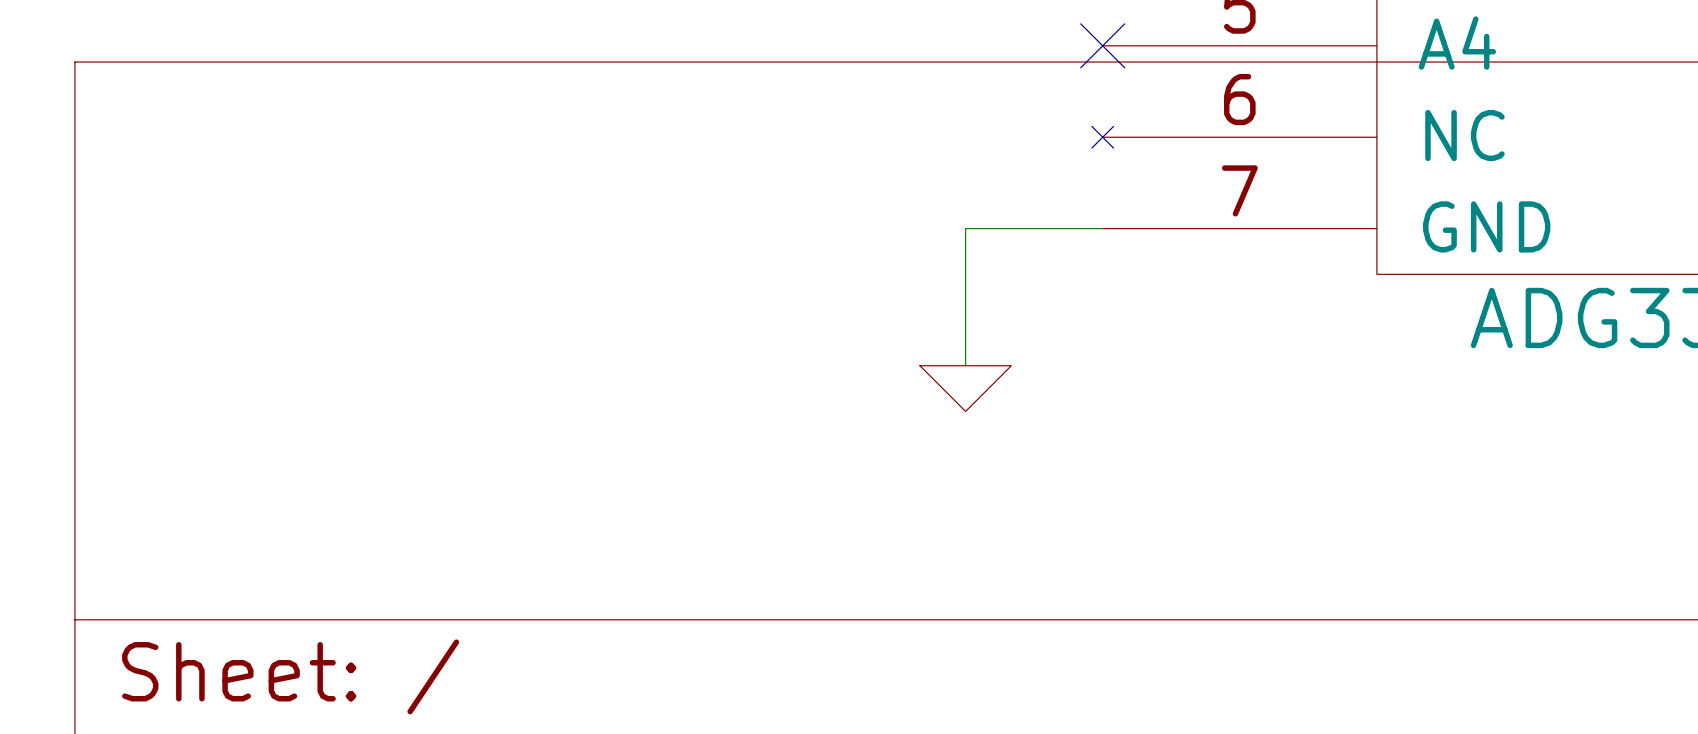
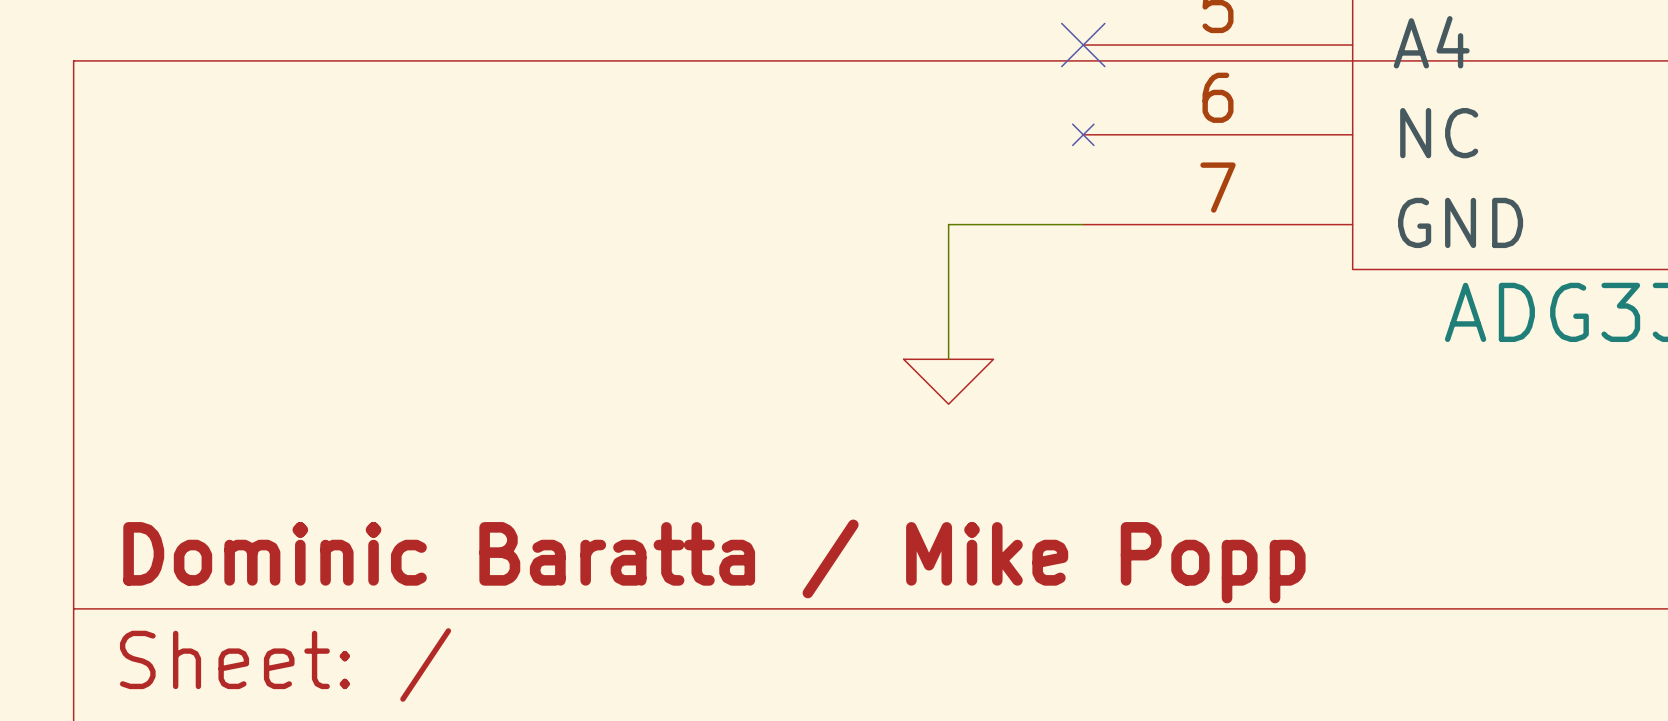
title block: none -> Dominic Baratta / Mike Popp (714, 561)

